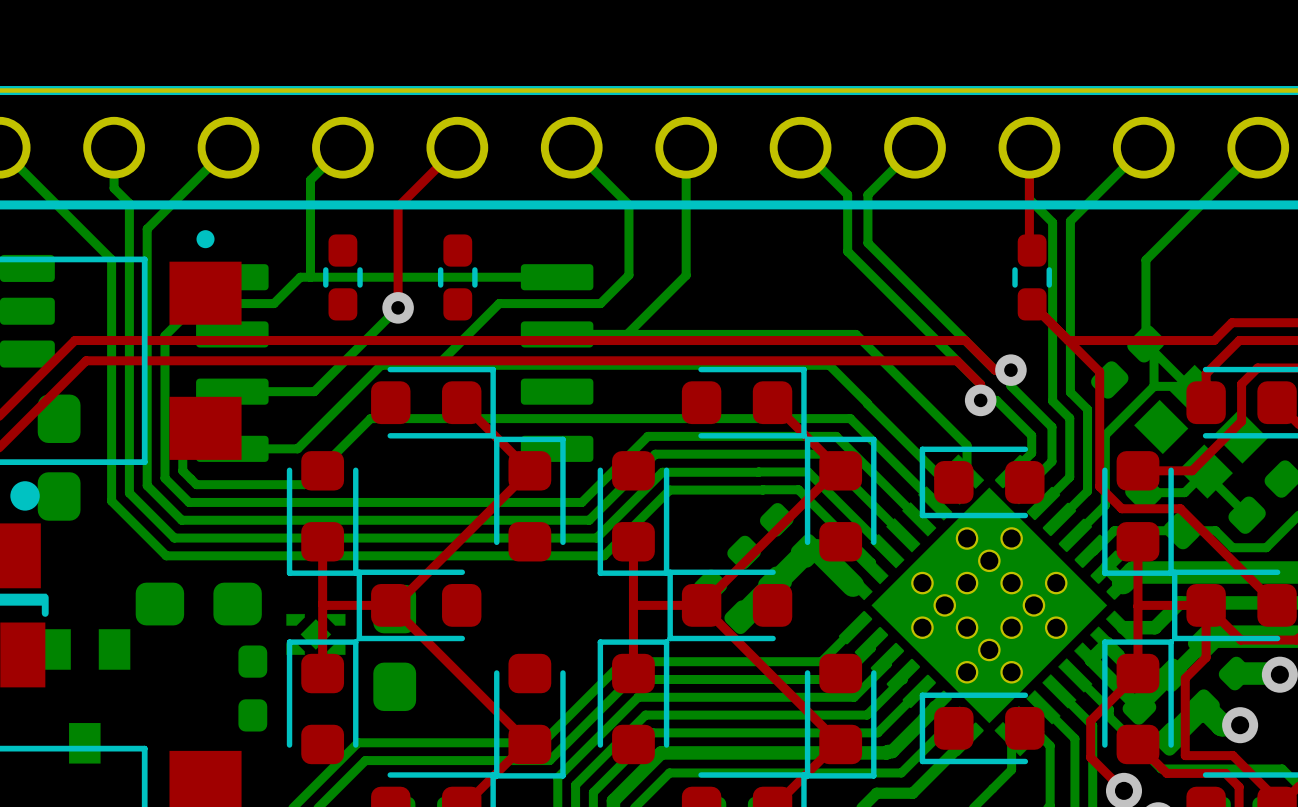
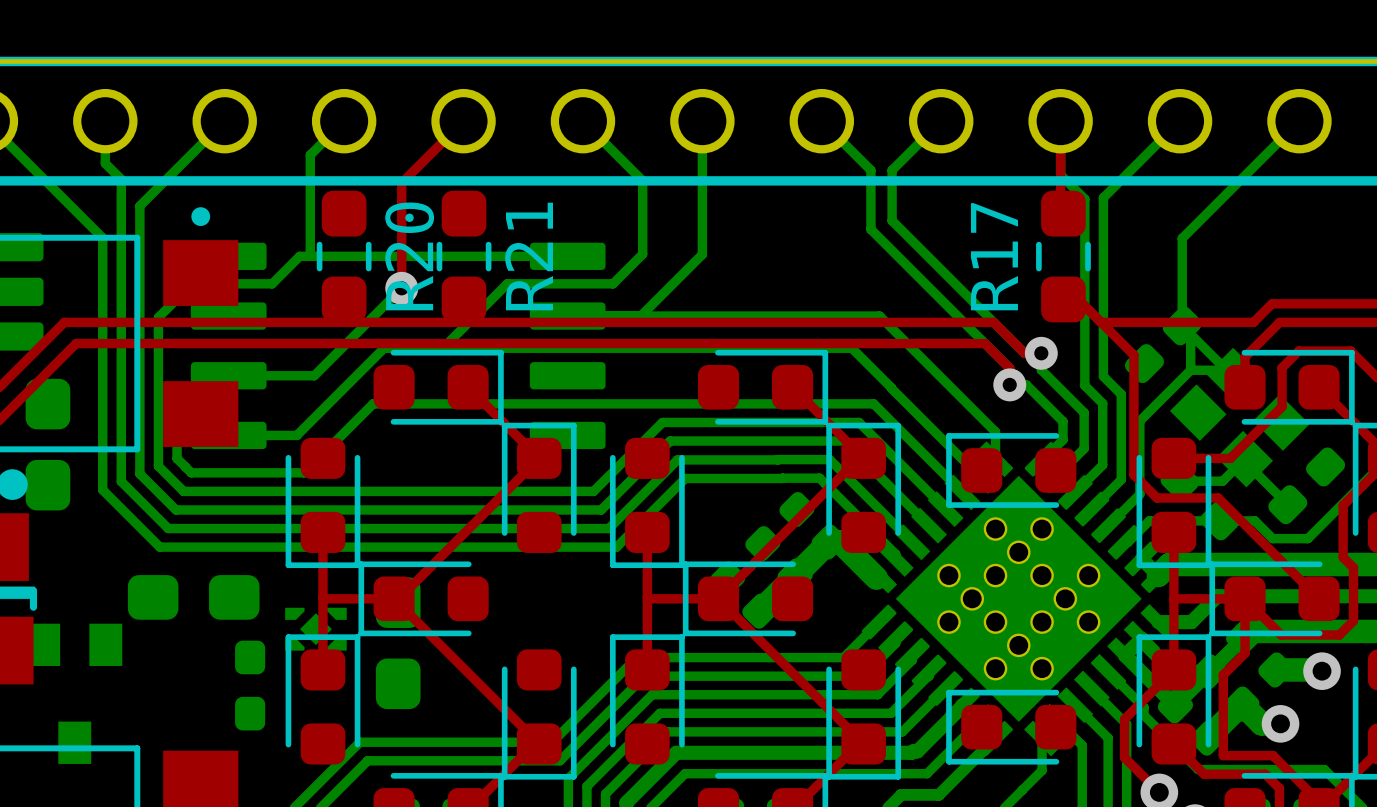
part: (342, 277) -> none
R20: none -> (344, 256)
part: (457, 277) -> none
R21: none -> (464, 256)
part: (1032, 277) -> none
R17: none -> (1063, 256)

